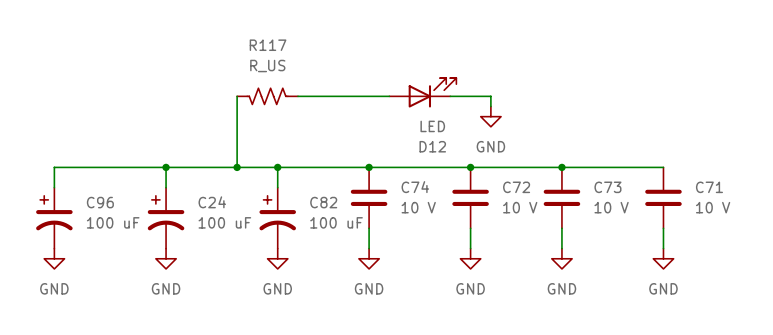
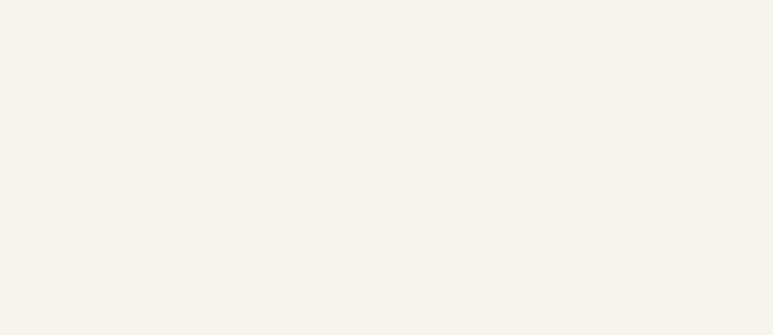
D12: LED (422, 92) -> none
wire: (237, 96) (237, 167) -> none
R117: R_US (267, 96) -> none
wire: (298, 96) (389, 96) -> none
wire: (450, 96) (490, 96) (490, 106) -> none
power symbol: GND (490, 116) -> none
wire: (166, 167) (166, 187) -> none
junction: (166, 167) -> none
junction: (237, 167) -> none
wire: (277, 167) (277, 187) -> none
junction: (277, 167) -> none
junction: (369, 167) -> none
junction: (470, 167) -> none
junction: (561, 167) -> none
wire: (663, 167) (54, 167) (54, 187) -> none
C74: 10 V (369, 197) -> none
C72: 10 V (470, 197) -> none
C73: 10 V (561, 197) -> none
C71: 10 V (663, 197) -> none
C96: 100 uF (54, 218) -> none
C24: 100 uF (166, 218) -> none
C82: 100 uF (277, 218) -> none
wire: (369, 228) (369, 248) -> none
wire: (470, 228) (470, 248) -> none
wire: (561, 228) (561, 248) -> none
wire: (663, 228) (663, 248) -> none
power symbol: GND (54, 258) -> none
power symbol: GND (166, 258) -> none
power symbol: GND (277, 258) -> none
power symbol: GND (369, 258) -> none
power symbol: GND (470, 258) -> none
power symbol: GND (561, 258) -> none
power symbol: GND (663, 258) -> none

